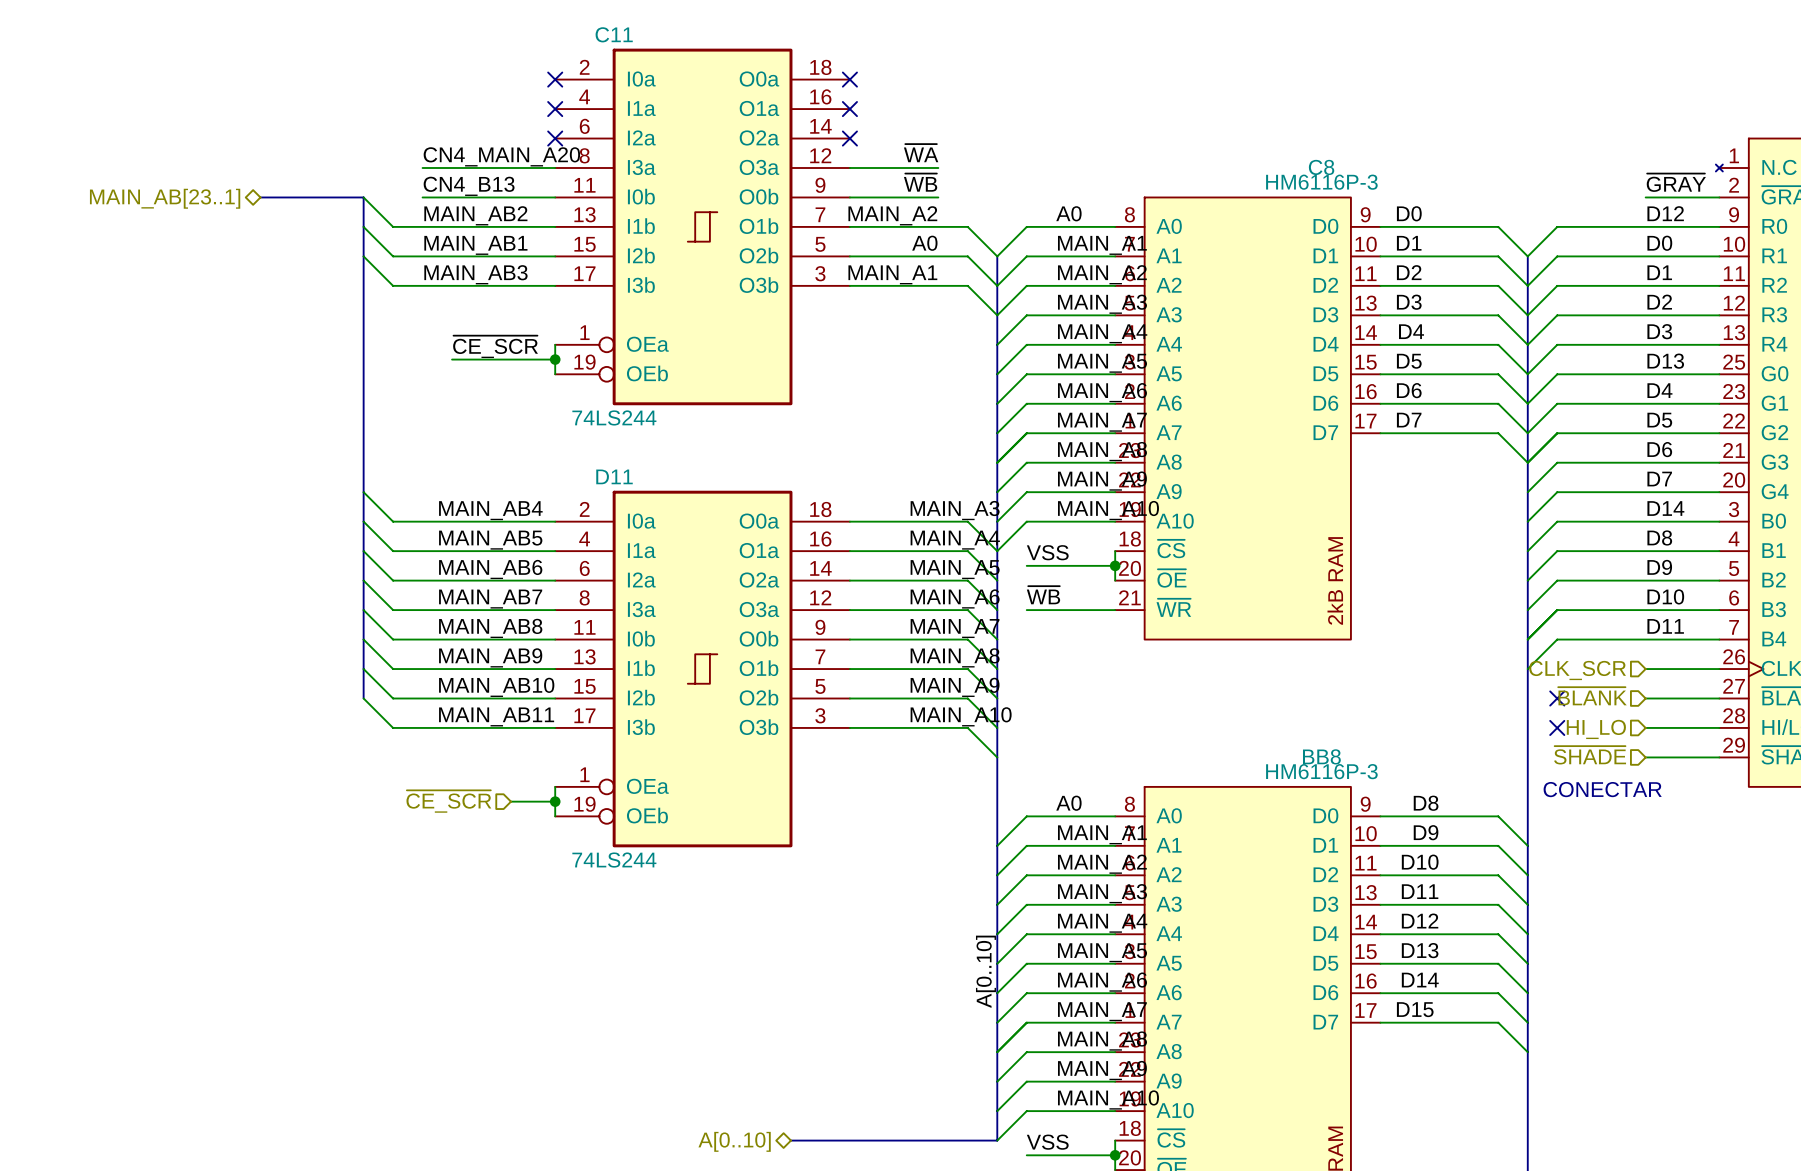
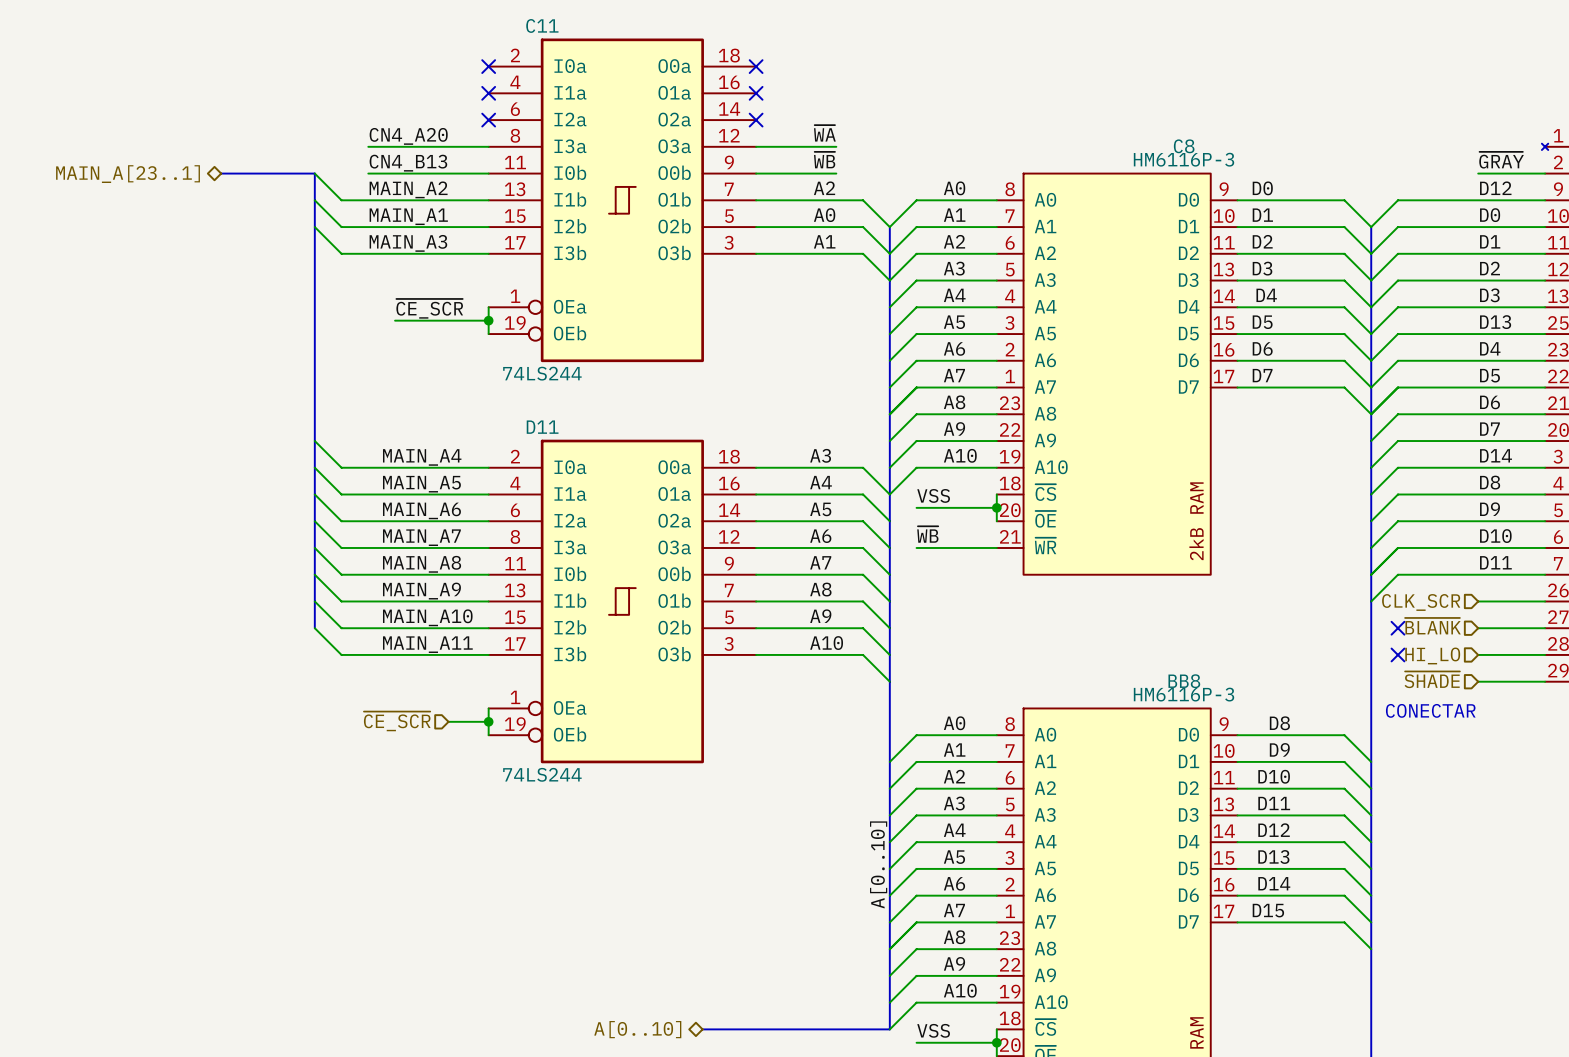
label: CN4_MAIN_A20 (501, 156) -> CN4_A20 (408, 136)
hierarchical label: MAIN_AB[23..1] (165, 198) -> MAIN_A[23..1] (128, 174)
label: MAIN_AB2 (475, 215) -> MAIN_A2 (408, 189)
label: MAIN_A2 (892, 215) -> A2 (824, 188)
label: MAIN_AB1 (475, 245) -> MAIN_A1 (408, 216)
label: MAIN_A1 (1102, 245) -> A1 (954, 215)
label: MAIN_AB3 (475, 274) -> MAIN_A3 (408, 243)
label: MAIN_A1 (892, 274) -> A1 (824, 241)
label: MAIN_A2 (1102, 274) -> A2 (954, 241)
label: MAIN_A3 (1102, 304) -> A3 (954, 268)
label: MAIN_A4 (1102, 333) -> A4 (954, 295)
label: MAIN_A5 (1102, 363) -> A5 (954, 322)
label: MAIN_A6 (1102, 392) -> A6 (954, 348)
label: MAIN_A7 (1102, 422) -> A7 (954, 375)
label: MAIN_A8 (1102, 451) -> A8 (954, 402)
label: MAIN_A9 (1102, 481) -> A9 (954, 428)
label: MAIN_AB4 (490, 510) -> MAIN_A4 (422, 457)
label: MAIN_A3 (955, 510) -> A3 (820, 455)
label: MAIN_A10 (1108, 510) -> A10 (960, 455)
label: MAIN_AB5 (490, 540) -> MAIN_A5 (421, 484)
label: MAIN_A4 (955, 540) -> A4 (821, 482)
label: MAIN_AB6 (490, 569) -> MAIN_A6 (421, 510)
label: MAIN_A5 (955, 569) -> A5 (820, 509)
label: MAIN_A6 (955, 598) -> A6 (820, 536)
label: MAIN_AB7 (490, 599) -> MAIN_A7 (421, 537)
label: MAIN_AB8 (490, 628) -> MAIN_A8 (422, 564)
label: MAIN_A7 (955, 628) -> A7 (820, 562)
label: MAIN_AB9 (490, 657) -> MAIN_A9 (421, 591)
label: MAIN_A8 (955, 657) -> A8 (820, 589)
label: MAIN_AB10 (496, 687) -> MAIN_A10 (427, 617)
label: MAIN_A9 (955, 687) -> A9 (820, 616)
label: MAIN_AB11 (496, 716) -> MAIN_A11 (427, 644)
label: MAIN_A10 (961, 716) -> A10 (826, 643)
label: MAIN_A1 (1102, 834) -> A1 (954, 750)
label: MAIN_A2 (1102, 864) -> A2 (954, 776)
label: MAIN_A3 (1102, 893) -> A3 (954, 803)
label: MAIN_A4 (1102, 923) -> A4 (954, 830)
label: MAIN_A5 (1102, 952) -> A5 (954, 857)
label: MAIN_A6 (1102, 982) -> A6 (954, 883)
label: MAIN_A7 (1102, 1011) -> A7 (954, 910)
label: MAIN_A8 (1102, 1041) -> A8 (954, 937)
label: MAIN_A9 (1102, 1070) -> A9 (954, 963)
label: MAIN_A10 (1108, 1099) -> A10 (960, 990)

